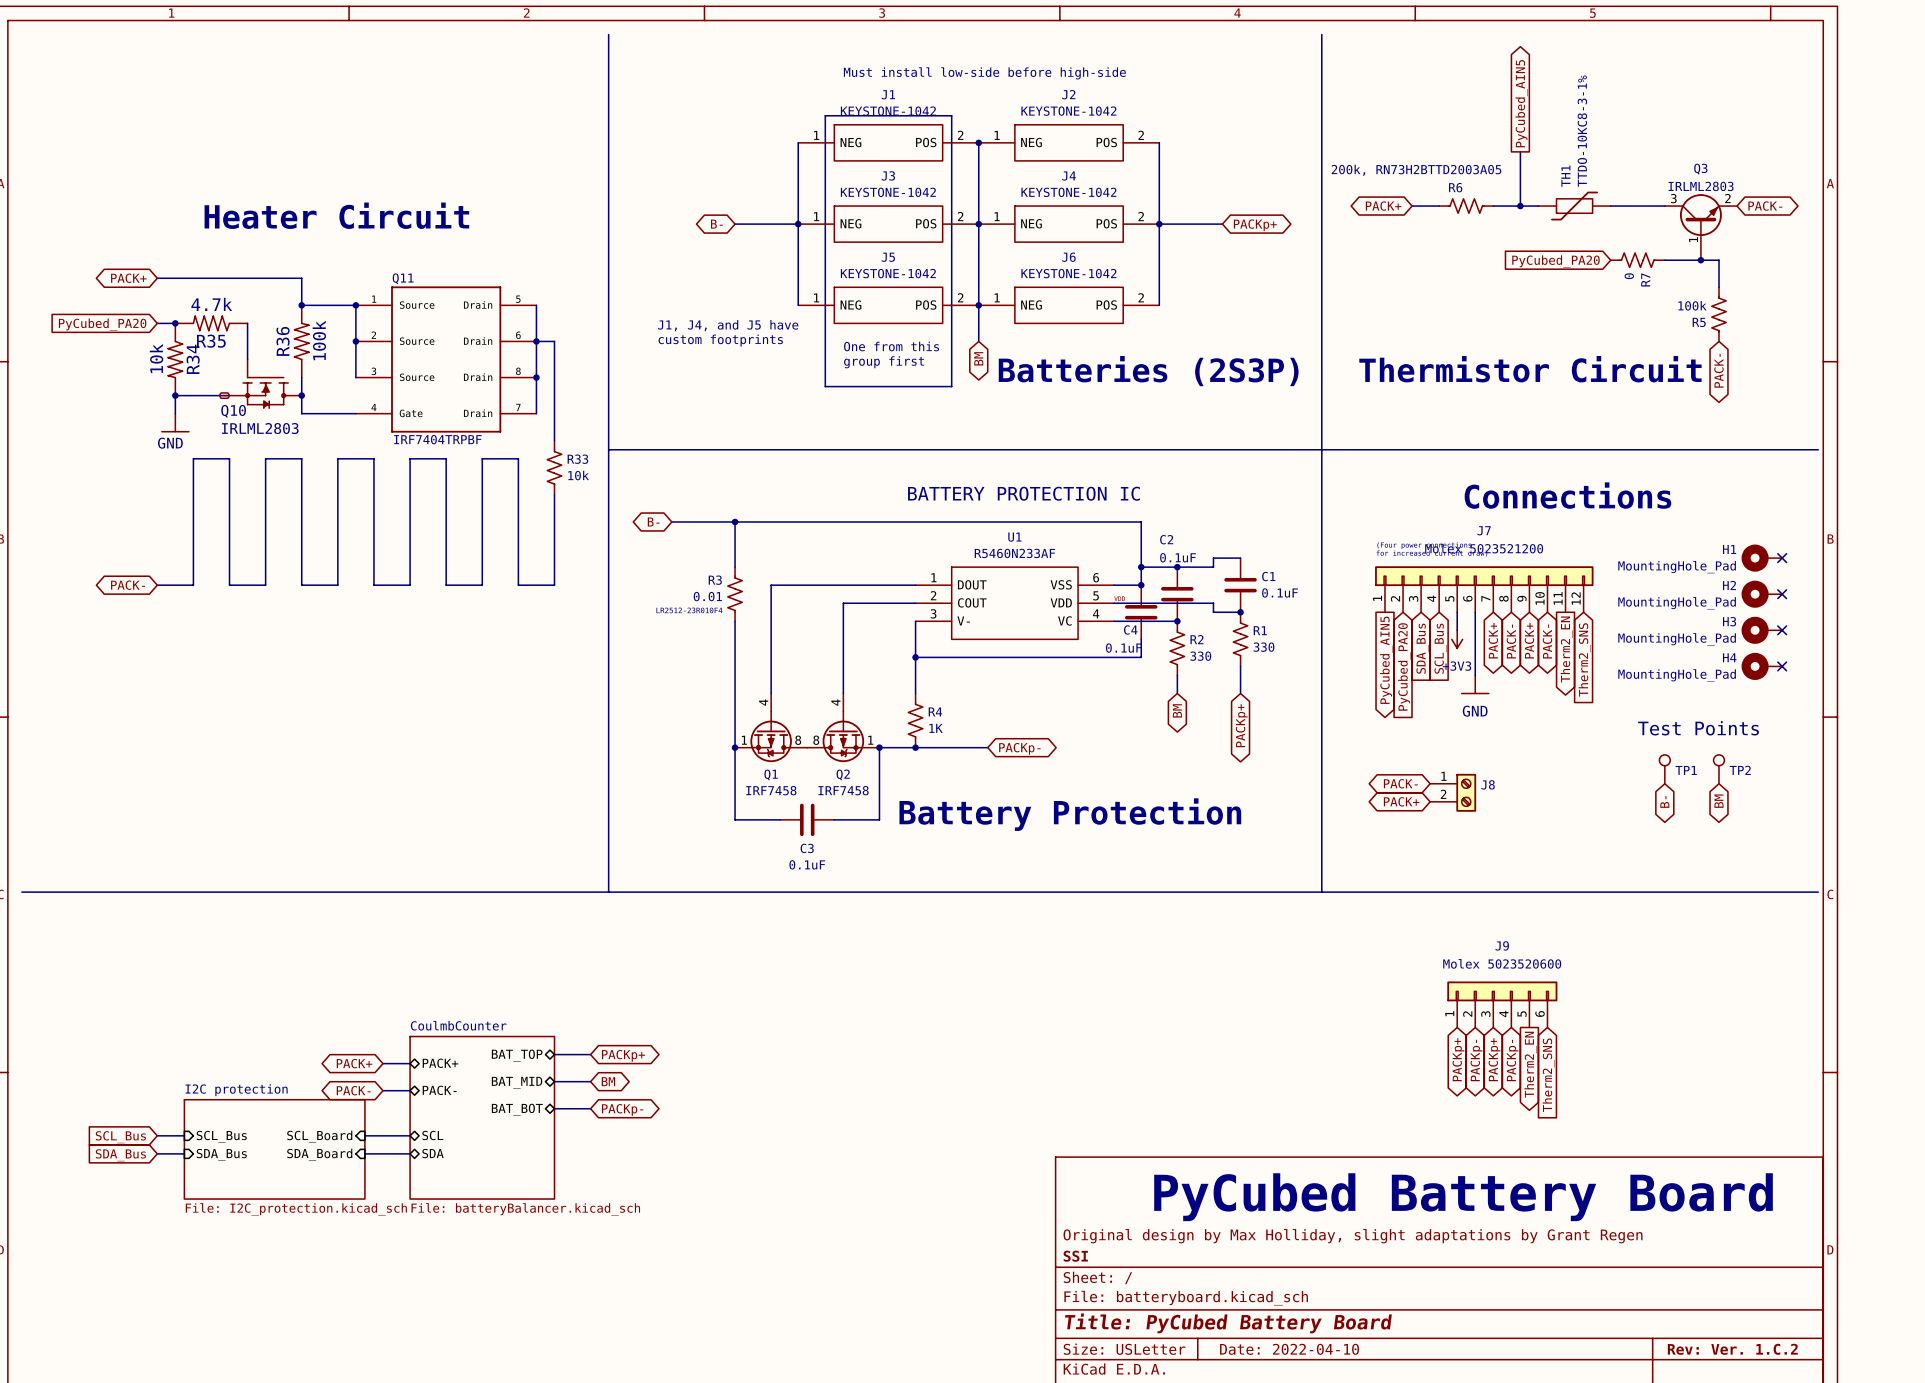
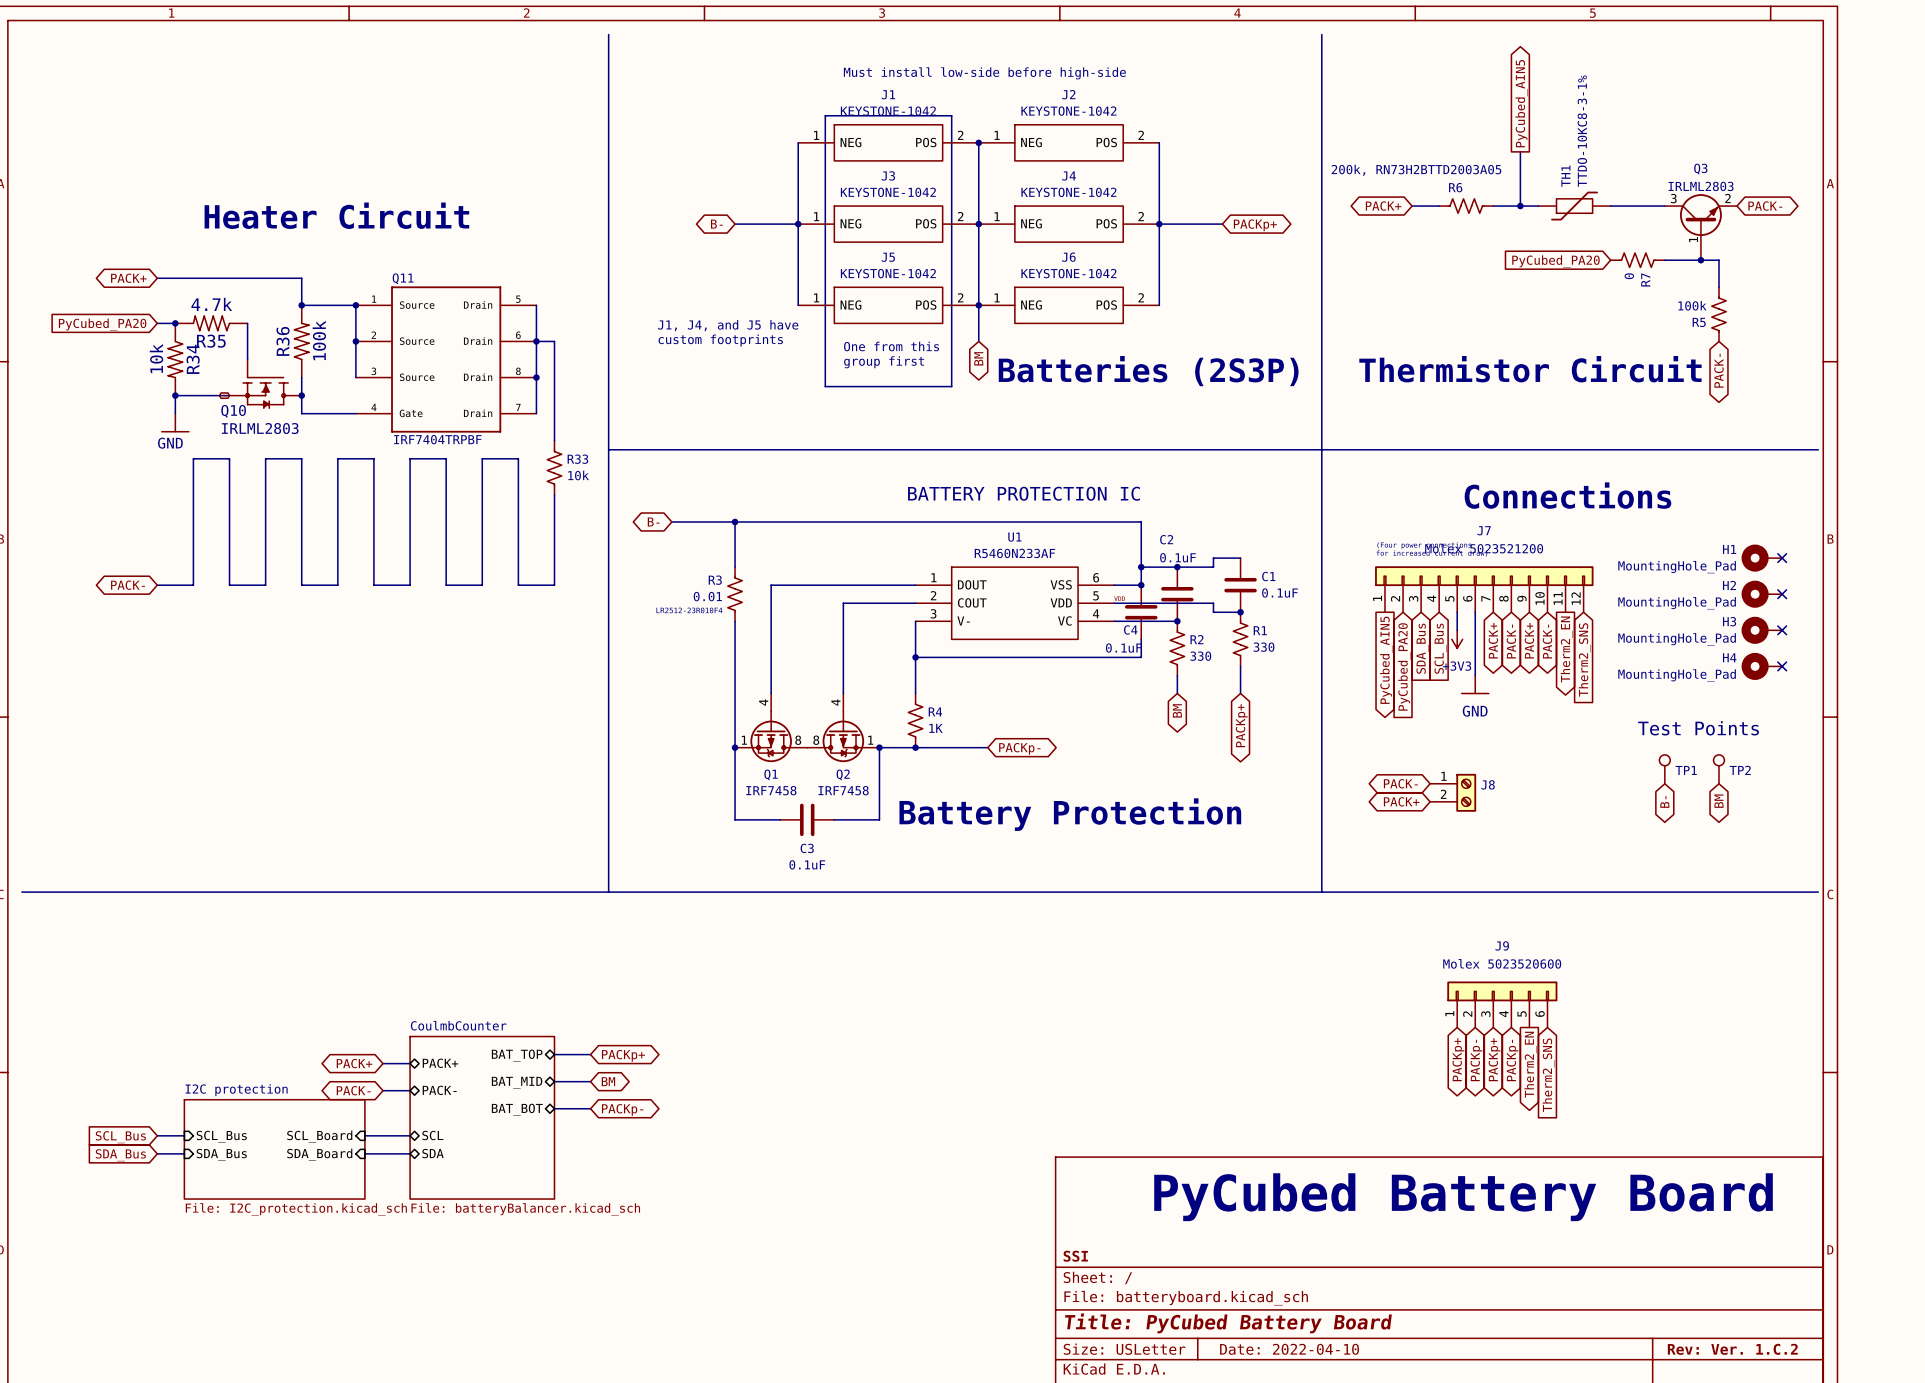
title block: Original design by Max Holliday, slight adaptations by Grant Regen (1353, 1236) -> none

